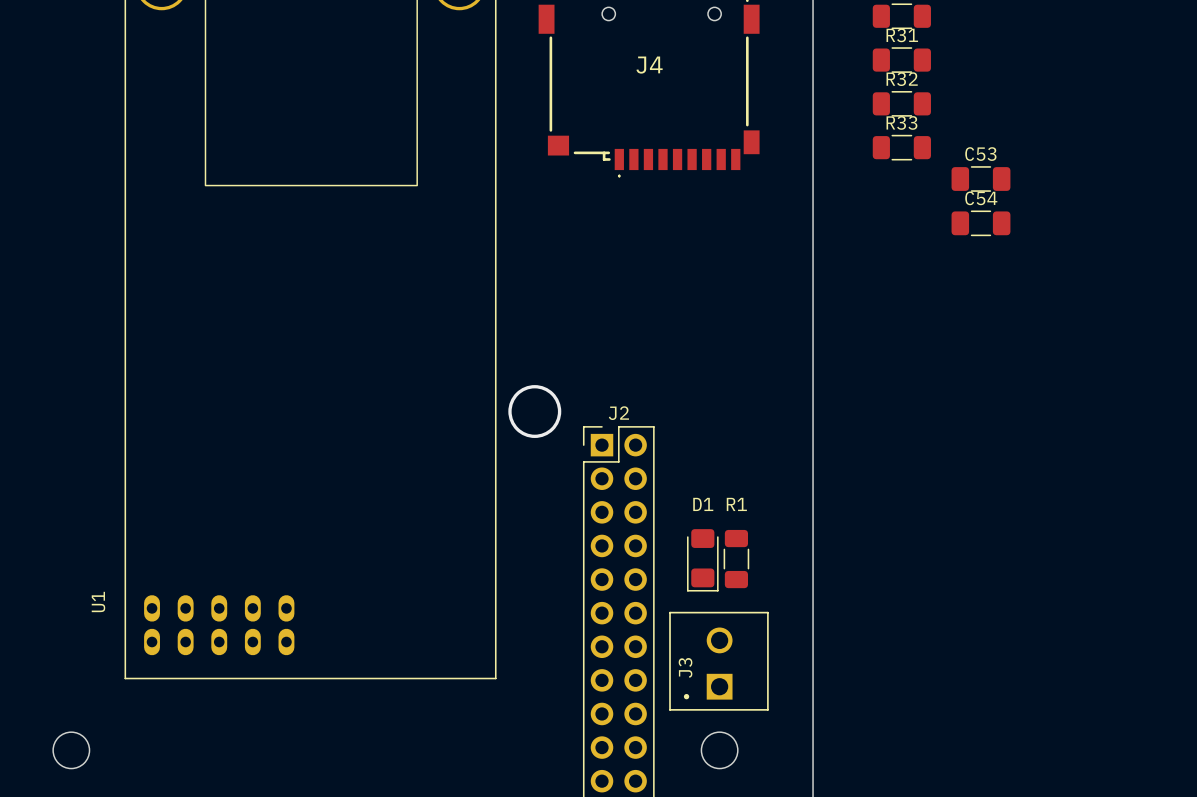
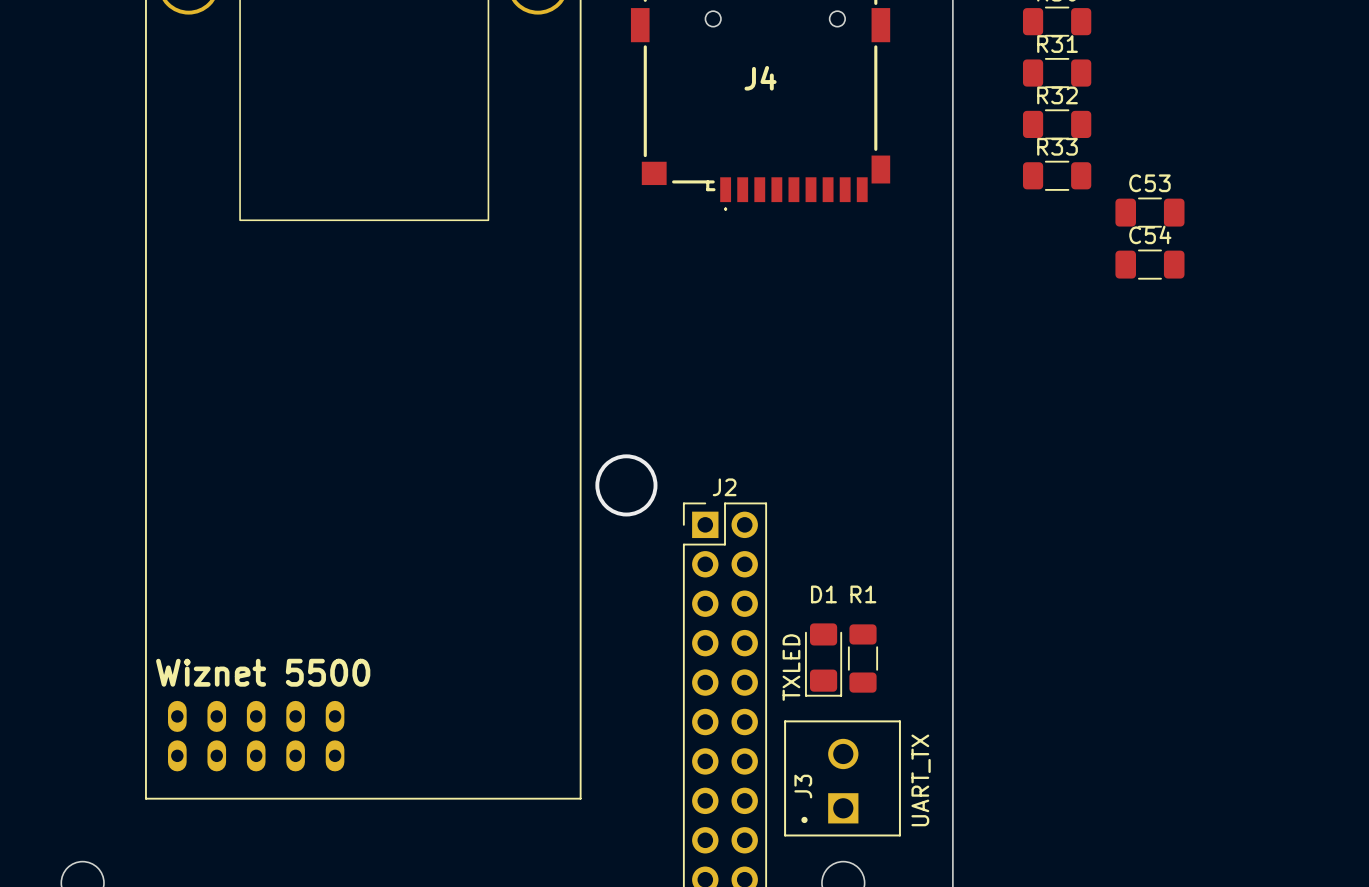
D1 value: none -> TXLED (791, 667)
text: none -> Wiznet 5500 (263, 672)
U1 name: U1 (98, 601) -> none
J3 value: none -> UART_TX (921, 780)

